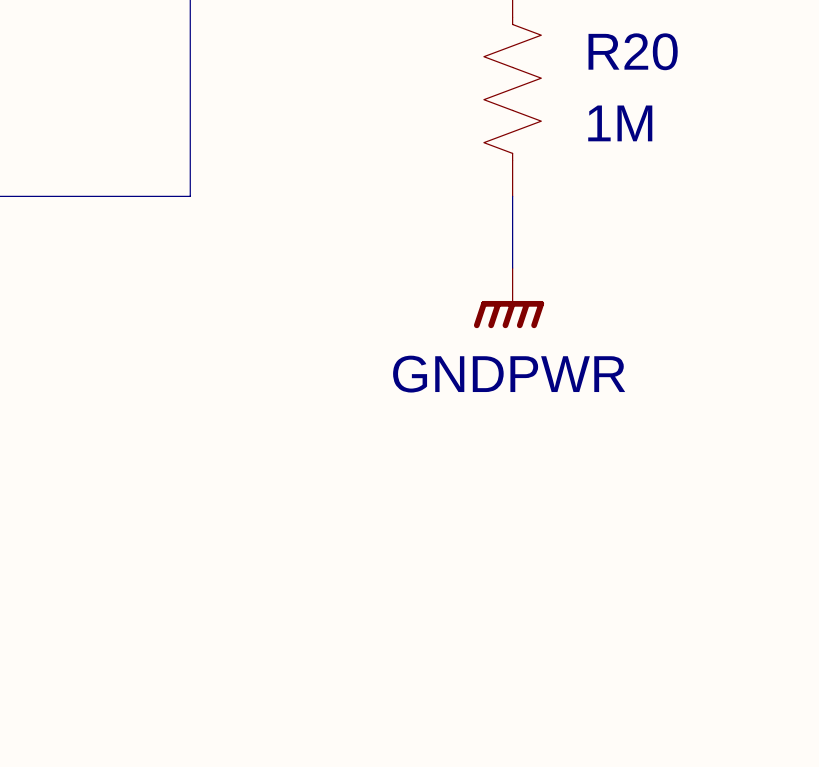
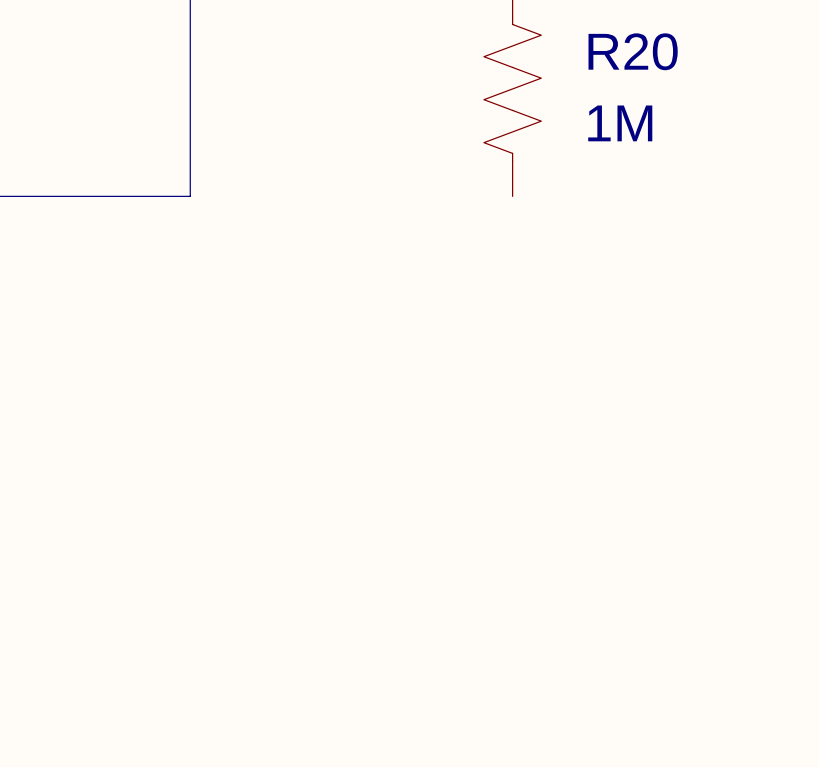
wire: (512, 196) (512, 268) -> none
power symbol: GNDPWR (509, 298) -> none

